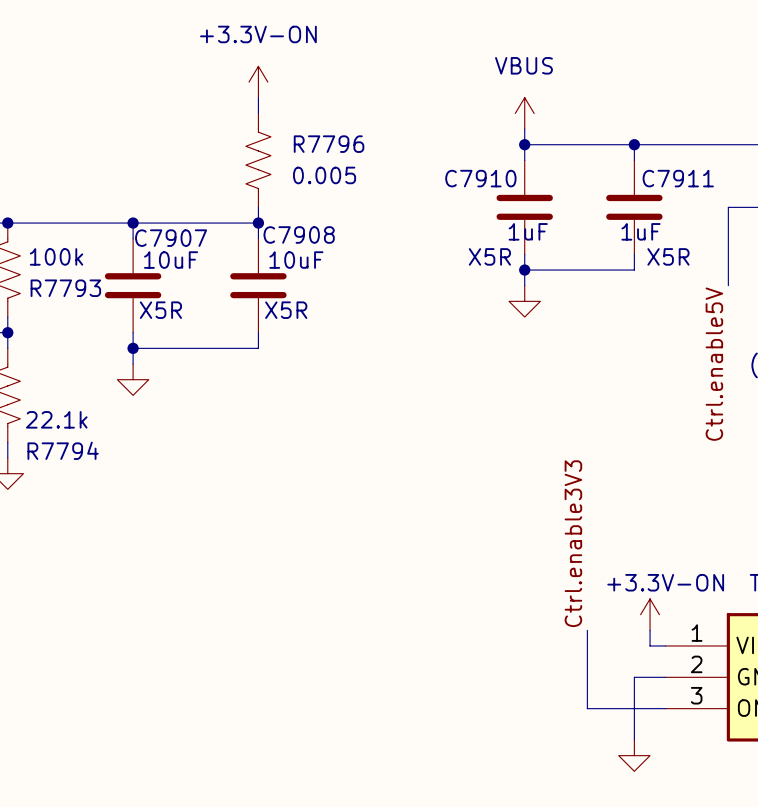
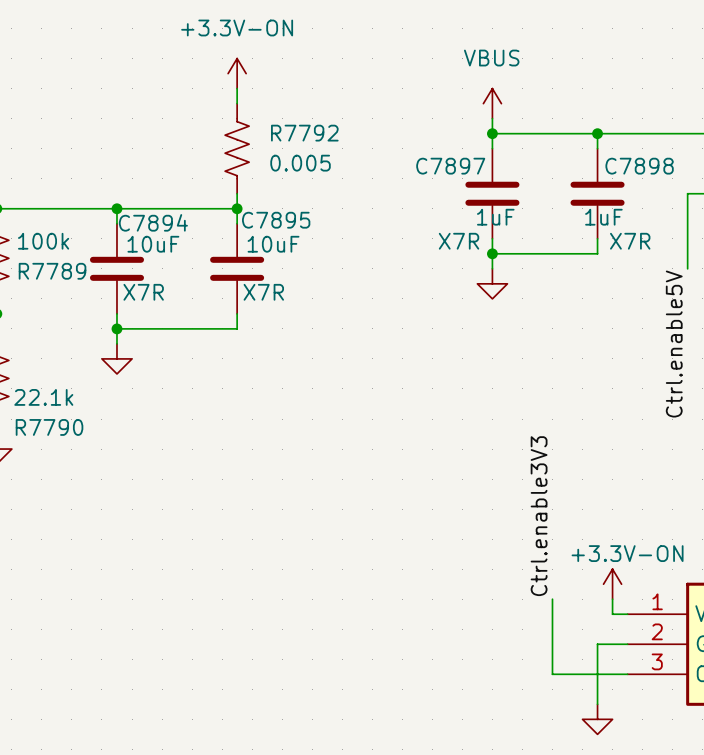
R7796 name: R7796 (329, 144) -> R7792 (304, 133)
C7910 name: C7910 (480, 178) -> C7897 (450, 166)
C7911 name: C7911 (678, 178) -> C7898 (639, 166)
C7908 name: C7908 (299, 234) -> C7895 (276, 220)
C7907 name: C7907 (171, 238) -> C7894 (153, 222)
C7910 text: X5R (489, 256) -> X7R (459, 241)
C7911 text: X5R (668, 256) -> X7R (630, 241)
R7793 name: R7793 (65, 288) -> R7789 (52, 271)
C7907 text: X5R (160, 310) -> X7R (143, 292)
C7908 text: X5R (286, 310) -> X7R (263, 292)
R7794 name: R7794 (63, 450) -> R7790 (49, 427)

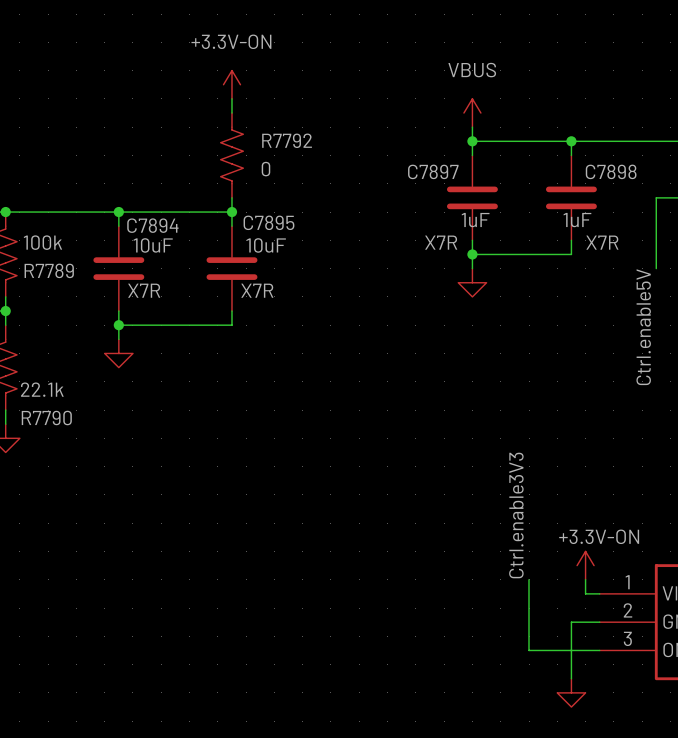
R7792 value: 0.005 (300, 163) -> 0 (265, 169)

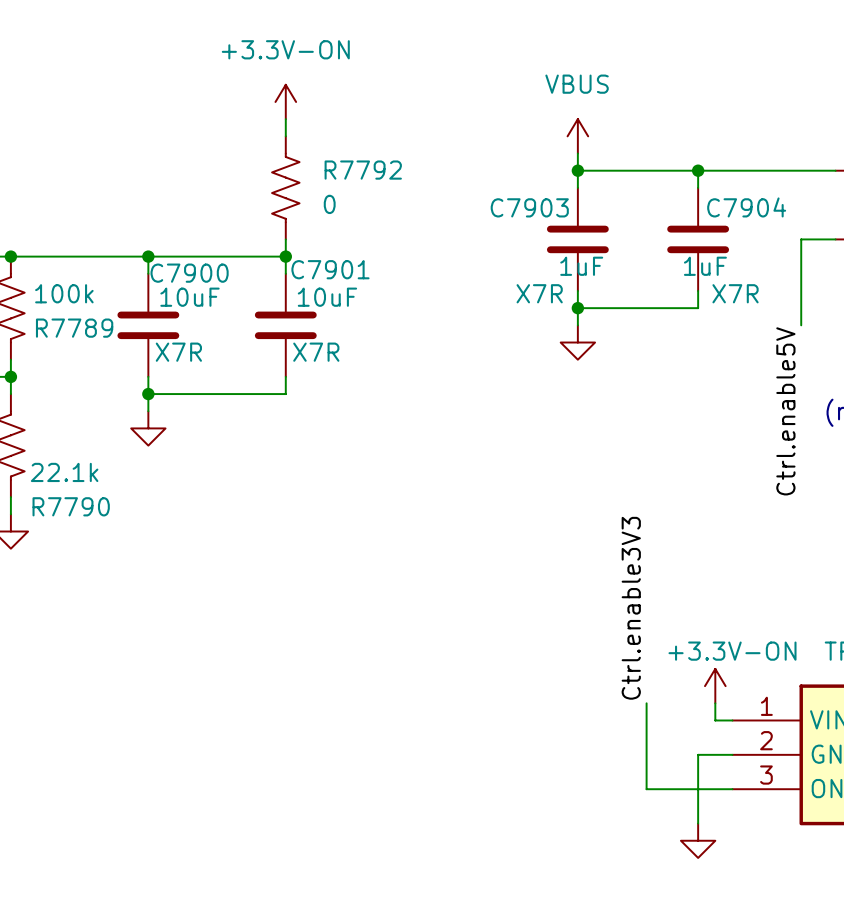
C7897 name: C7897 (433, 171) -> C7903 (529, 207)
C7898 name: C7898 (611, 171) -> C7904 (746, 207)
C7895 name: C7895 (268, 222) -> C7901 (330, 269)
C7894 name: C7894 (152, 225) -> C7900 (189, 273)

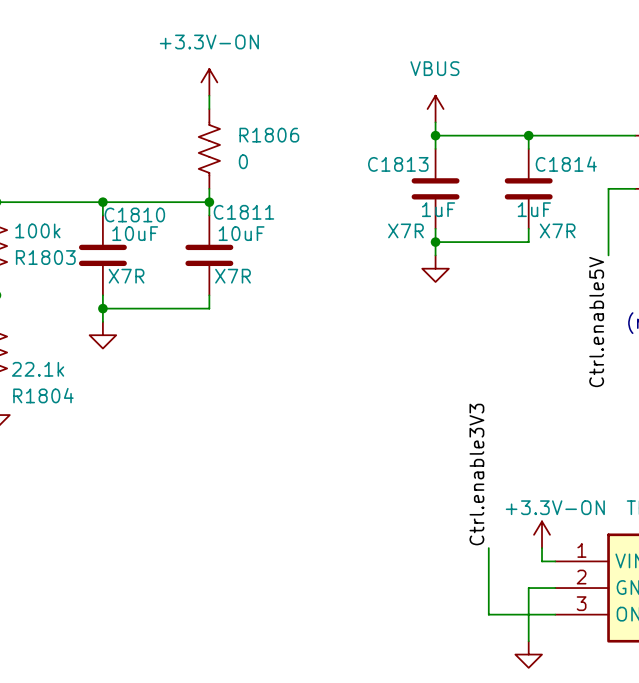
R7792 name: R7792 (363, 170) -> R1806 (269, 135)
C7903 name: C7903 (529, 207) -> C1813 (398, 164)
C7904 name: C7904 (746, 207) -> C1814 (566, 164)
C7901 name: C7901 (330, 269) -> C1811 (243, 212)
C7900 name: C7900 (189, 273) -> C1810 (134, 214)
R7789 name: R7789 (74, 328) -> R1803 (45, 257)
R7790 name: R7790 (71, 506) -> R1804 (43, 395)

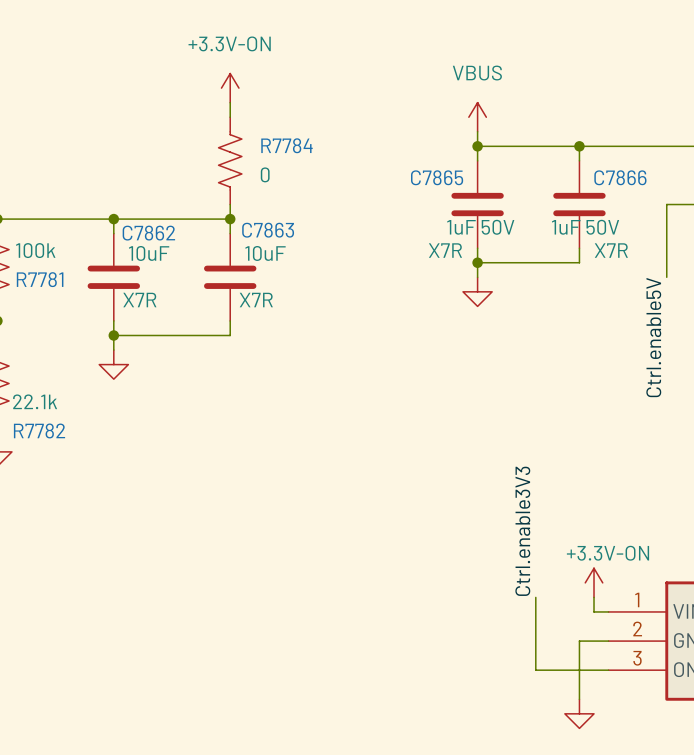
R1806 name: R1806 (269, 135) -> R7784 (287, 145)
C1813 name: C1813 (398, 164) -> C7865 (437, 177)
C1814 name: C1814 (566, 164) -> C7866 (620, 177)
C1813 value: 1uF (438, 209) -> 1uF 50V (480, 227)
C1814 value: 1uF (534, 209) -> 1uF 50V (585, 227)
C1811 name: C1811 (243, 212) -> C7863 (268, 230)
C1810 name: C1810 (134, 214) -> C7862 (148, 233)
R1803 name: R1803 (45, 257) -> R7781 (40, 279)
R1804 name: R1804 (43, 395) -> R7782 (39, 430)

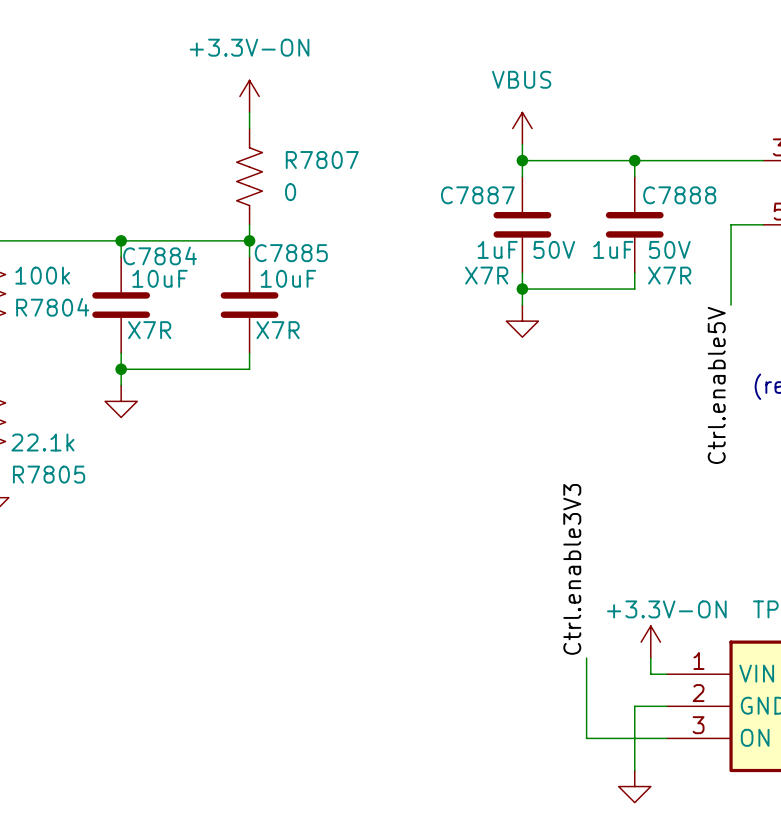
R7784 name: R7784 (287, 145) -> R7807 (322, 160)
C7865 name: C7865 (437, 177) -> C7887 (477, 195)
C7866 name: C7866 (620, 177) -> C7888 (679, 195)
C7863 name: C7863 (268, 230) -> C7885 (291, 253)
C7862 name: C7862 (148, 233) -> C7884 (160, 255)
R7781 name: R7781 (40, 279) -> R7804 (52, 307)
R7782 name: R7782 (39, 430) -> R7805 (49, 474)

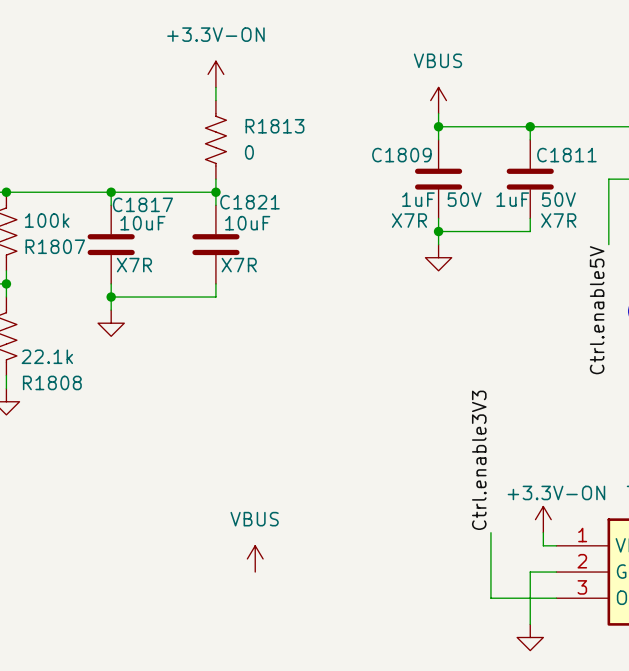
R7807 name: R7807 (322, 160) -> R1813 (274, 126)
C7887 name: C7887 (477, 195) -> C1809 (401, 155)
C7888 name: C7888 (679, 195) -> C1811 (566, 155)
C7885 name: C7885 (291, 253) -> C1821 (250, 202)
C7884 name: C7884 (160, 255) -> C1817 (142, 204)
R7804 name: R7804 (52, 307) -> R1807 (55, 246)
R7805 name: R7805 (49, 474) -> R1808 (52, 382)
power symbol: none -> VBUS (255, 558)

